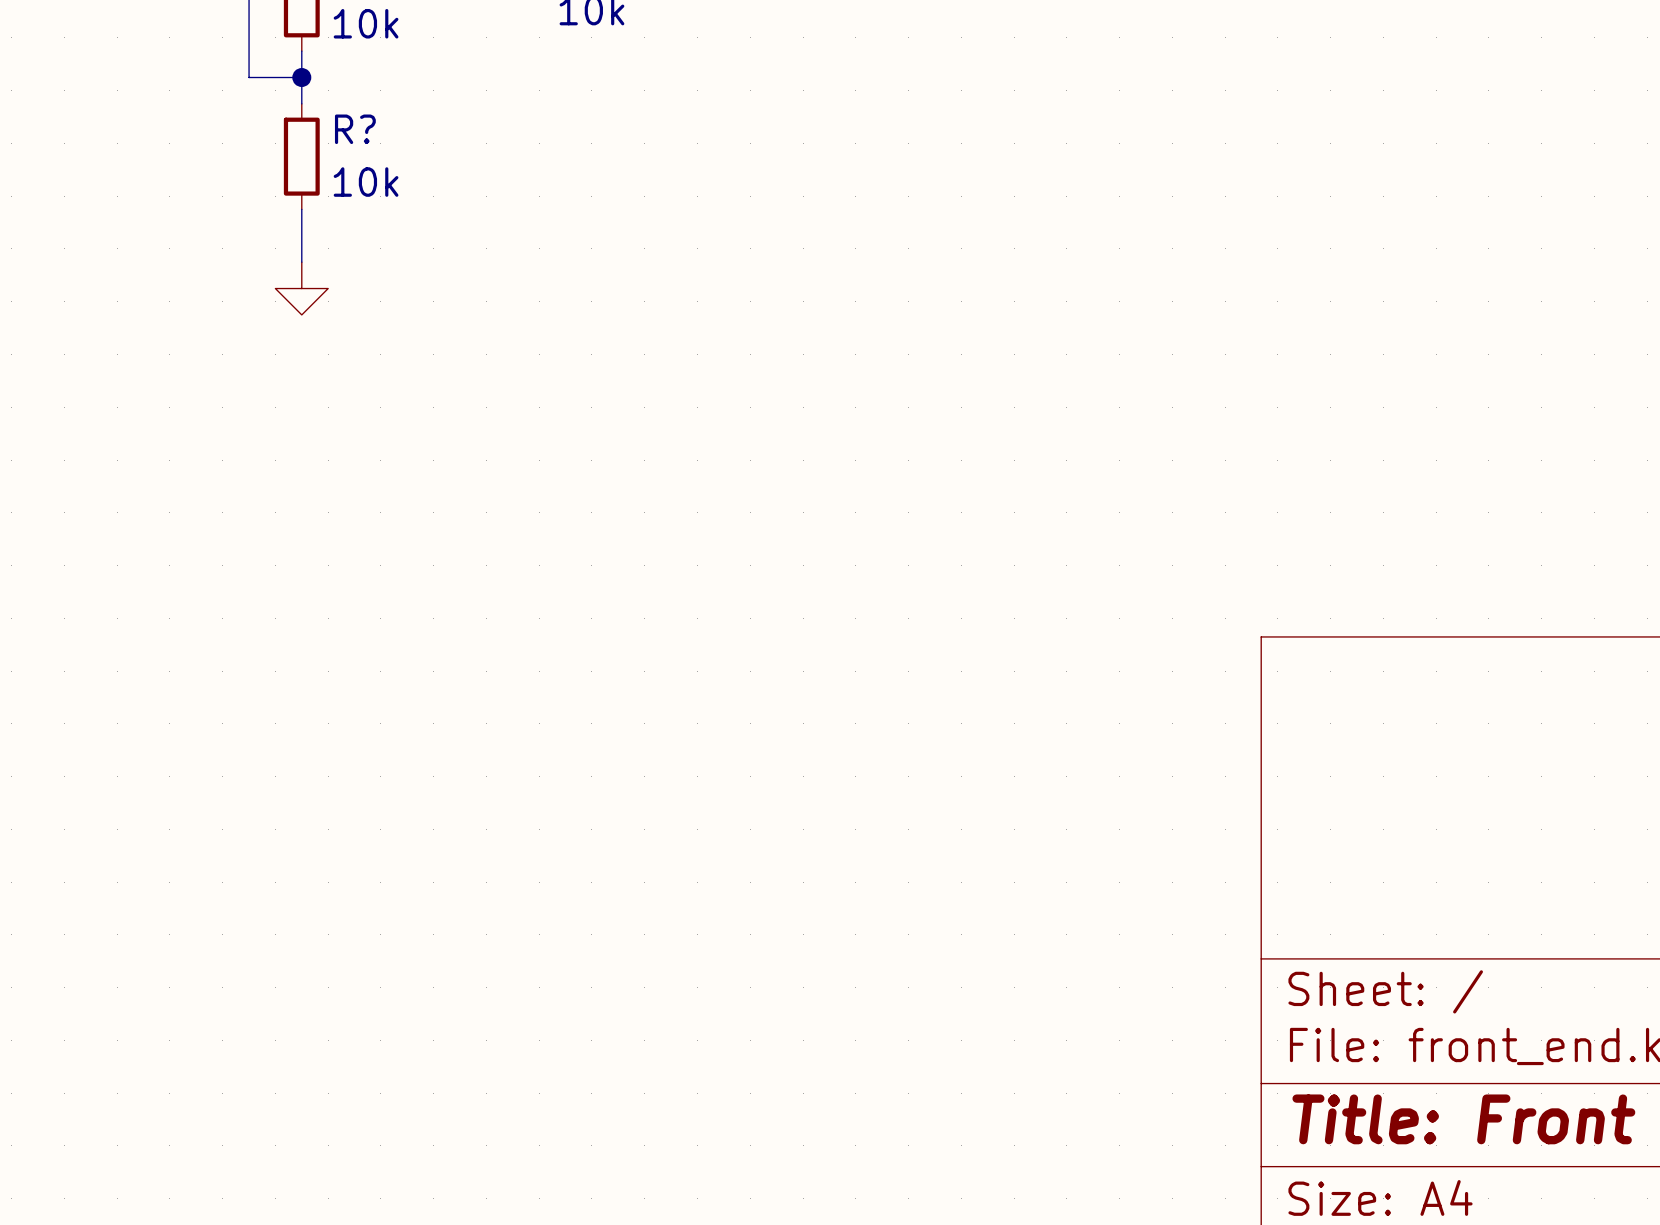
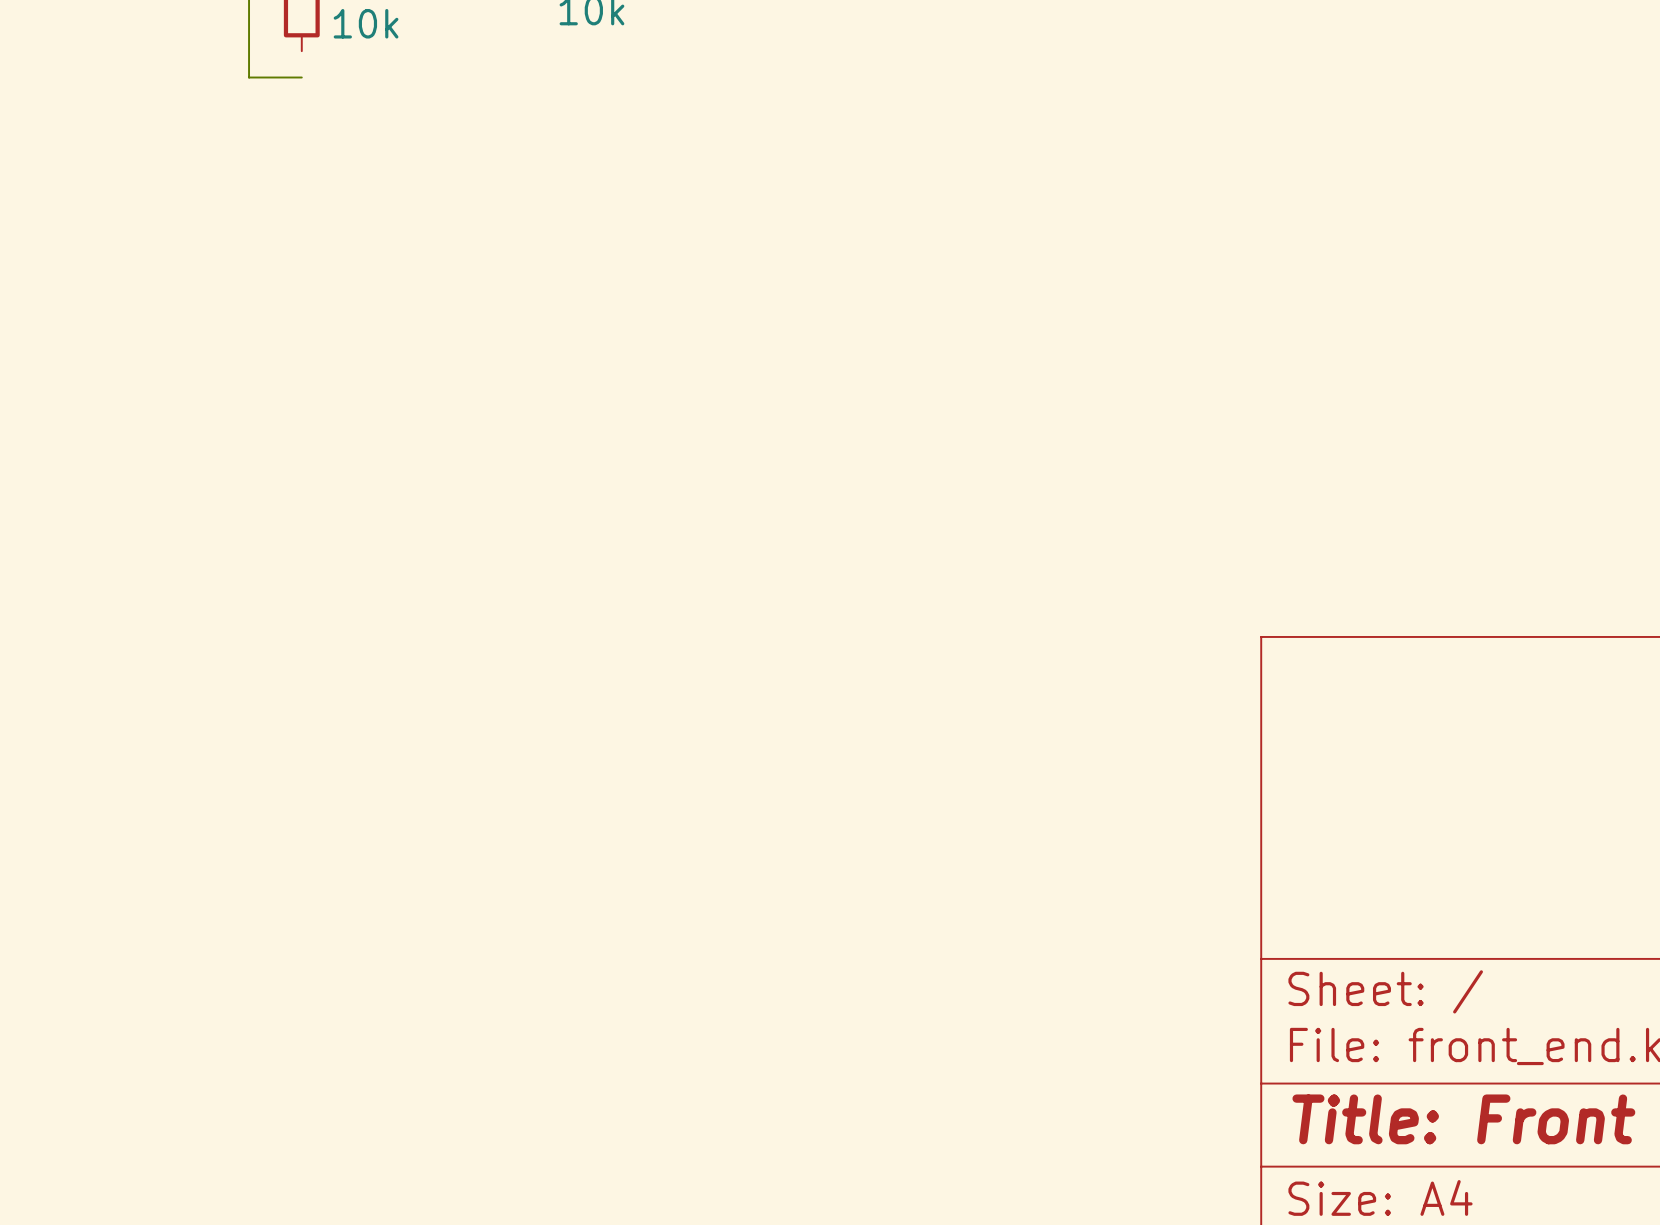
wire: (301, 51) (301, 103) -> none
junction: (301, 77) -> none
R?: 10k (301, 156) -> none
wire: (301, 209) (301, 262) -> none
power symbol: (301, 288) -> none

